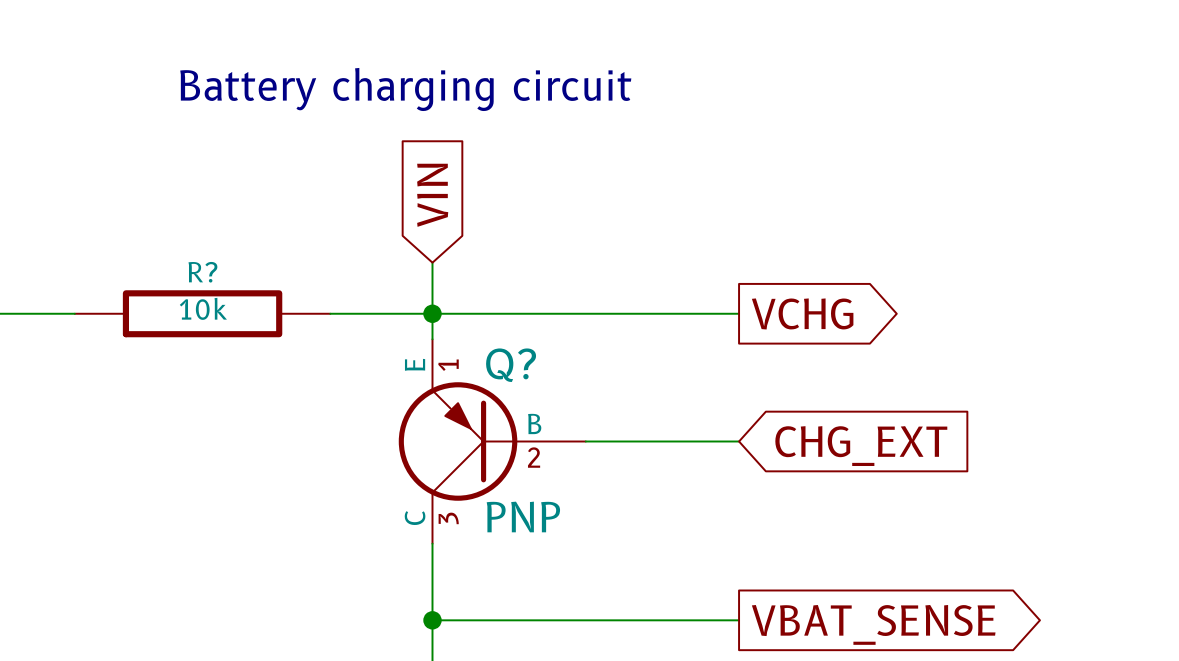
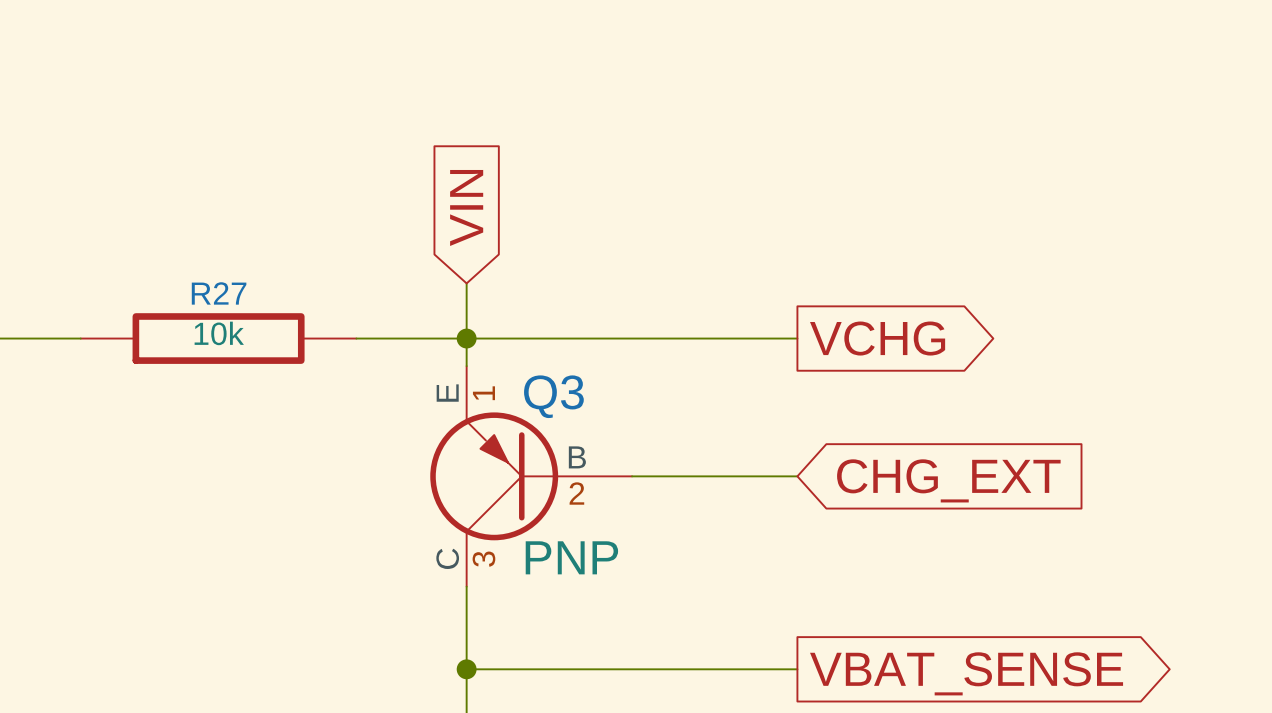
text: Battery charging circuit (405, 89) -> none
R? name: R? (202, 272) -> R27 (219, 293)
Q? name: Q? (511, 365) -> Q3 (553, 396)

